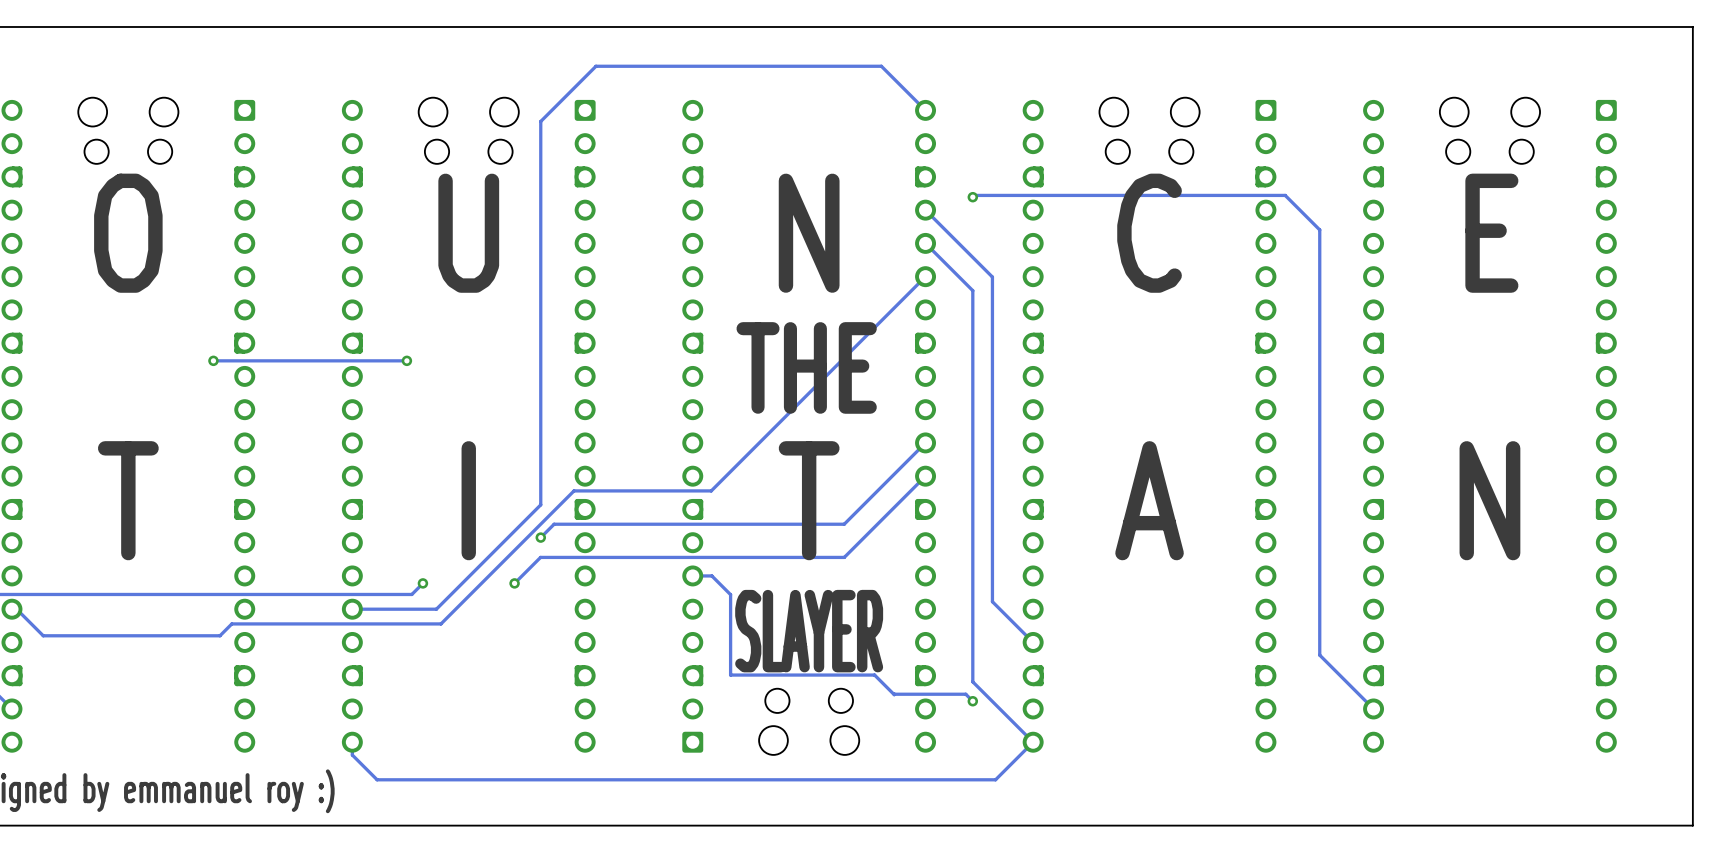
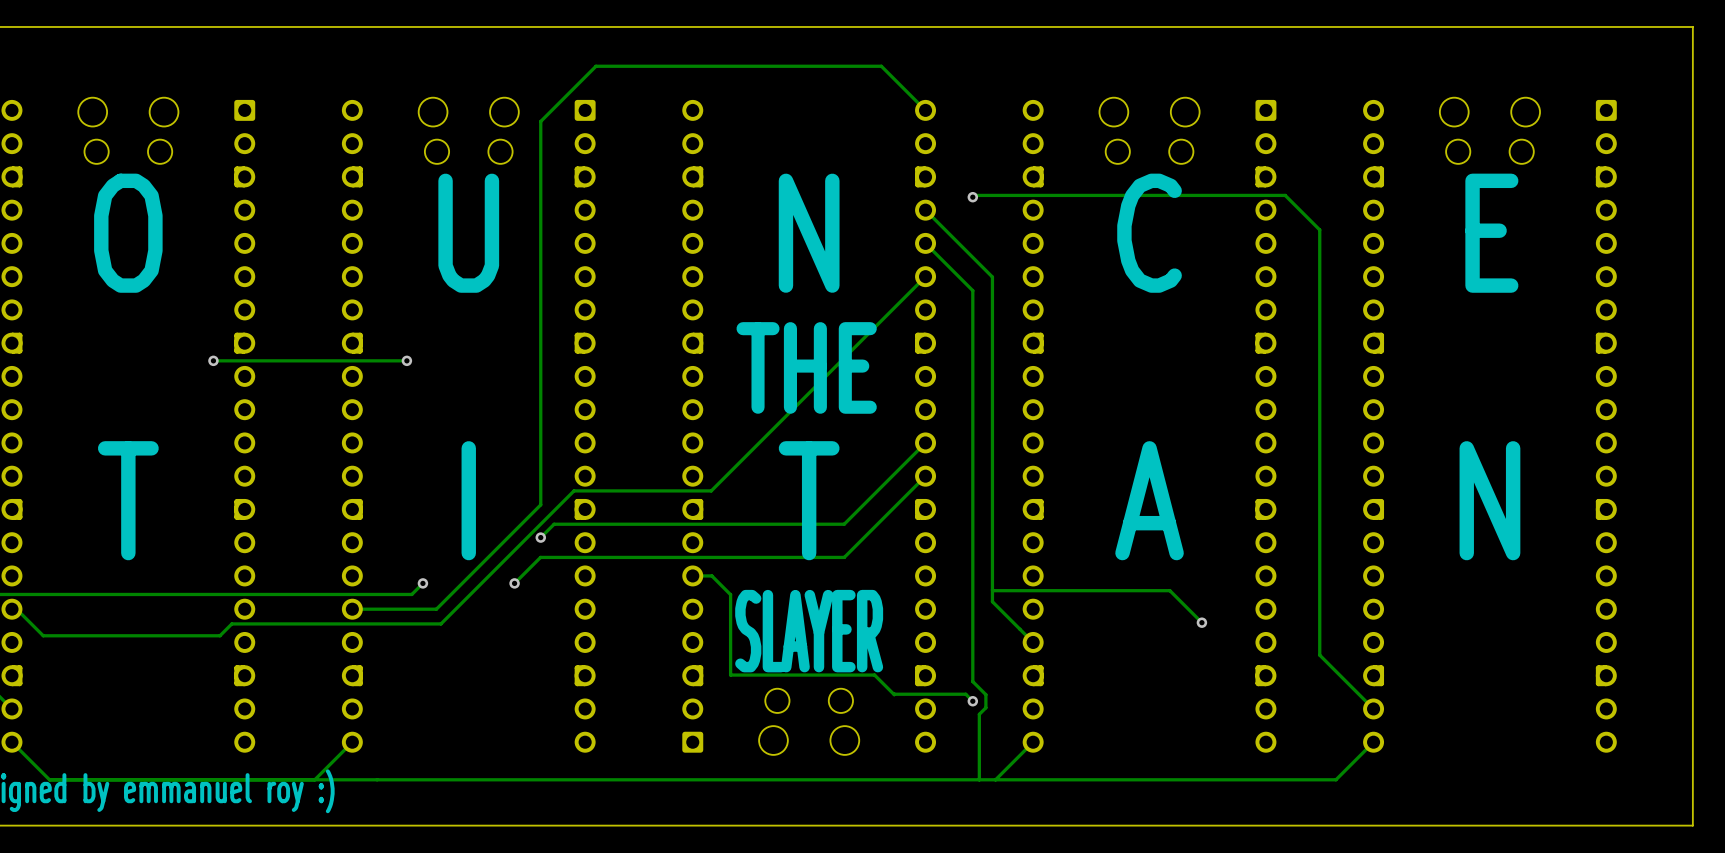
track: none -> (992, 589) (1169, 590) (1201, 622)
via: none -> (1201, 622)
track: (972, 681) (1033, 742) -> (972, 681) (985, 694) (985, 707) (979, 714) (979, 779)
track: none -> (11, 742) (49, 779) (377, 779)
track: (352, 742) (352, 755) (377, 779) -> (352, 742) (314, 779)
track: none -> (1373, 742) (1335, 779) (995, 779)

